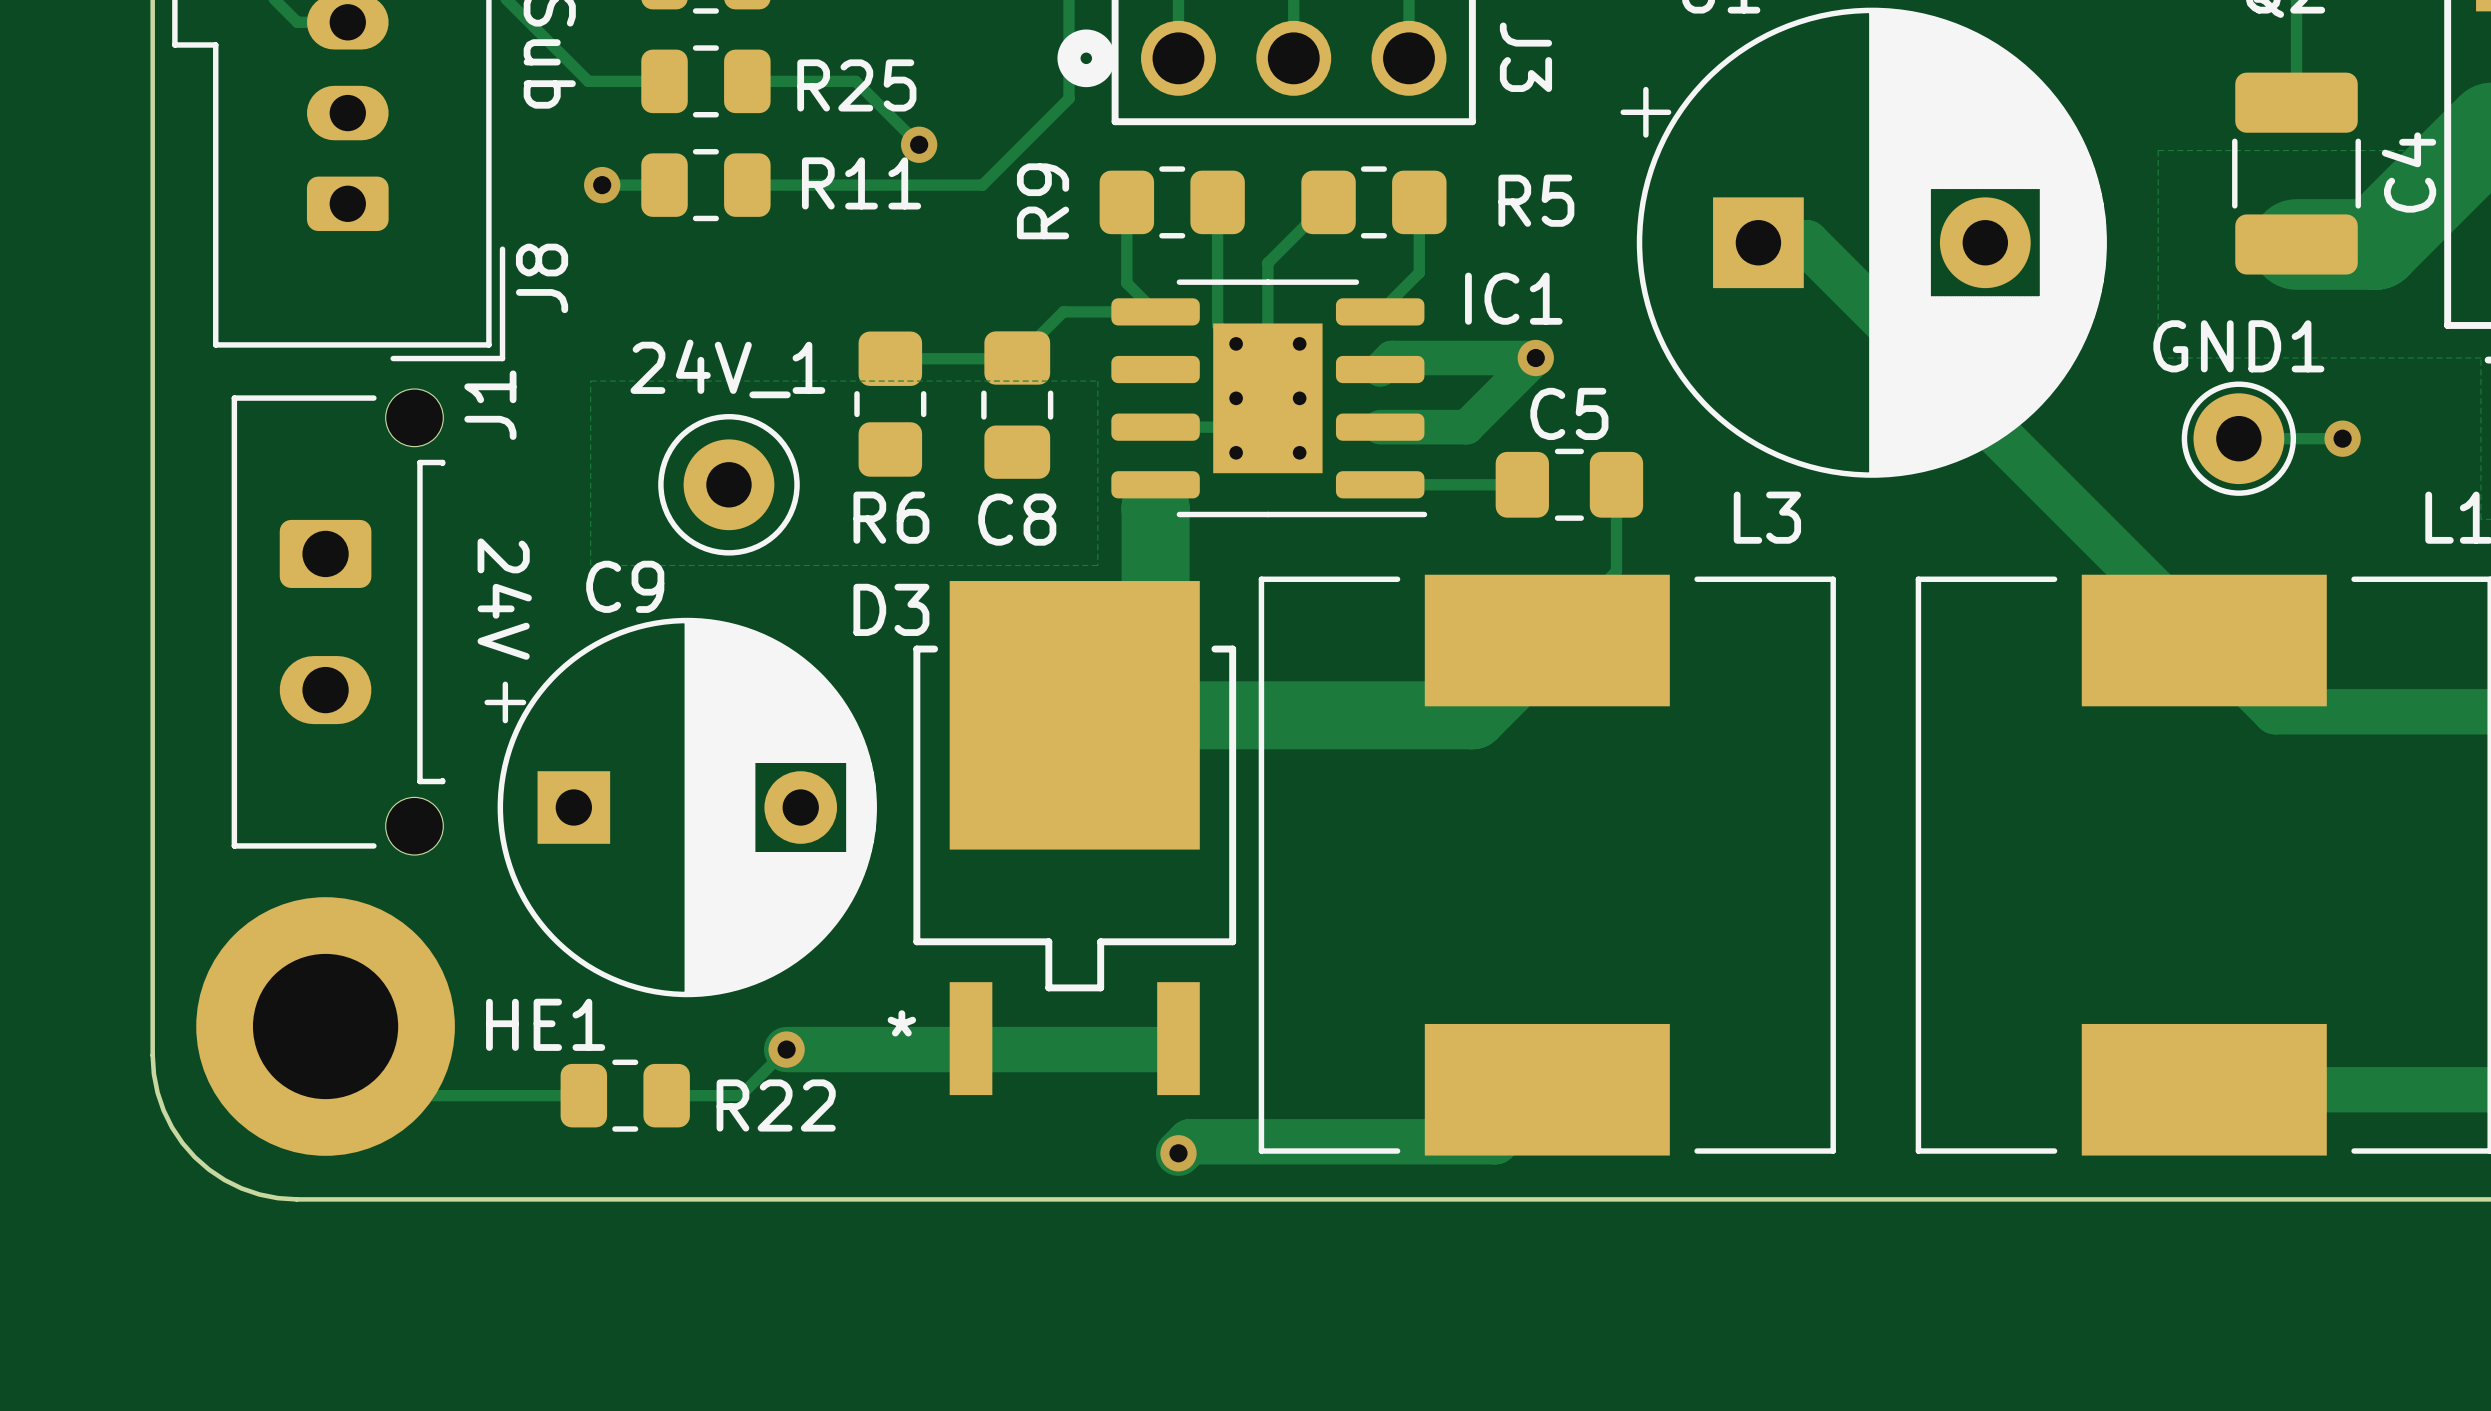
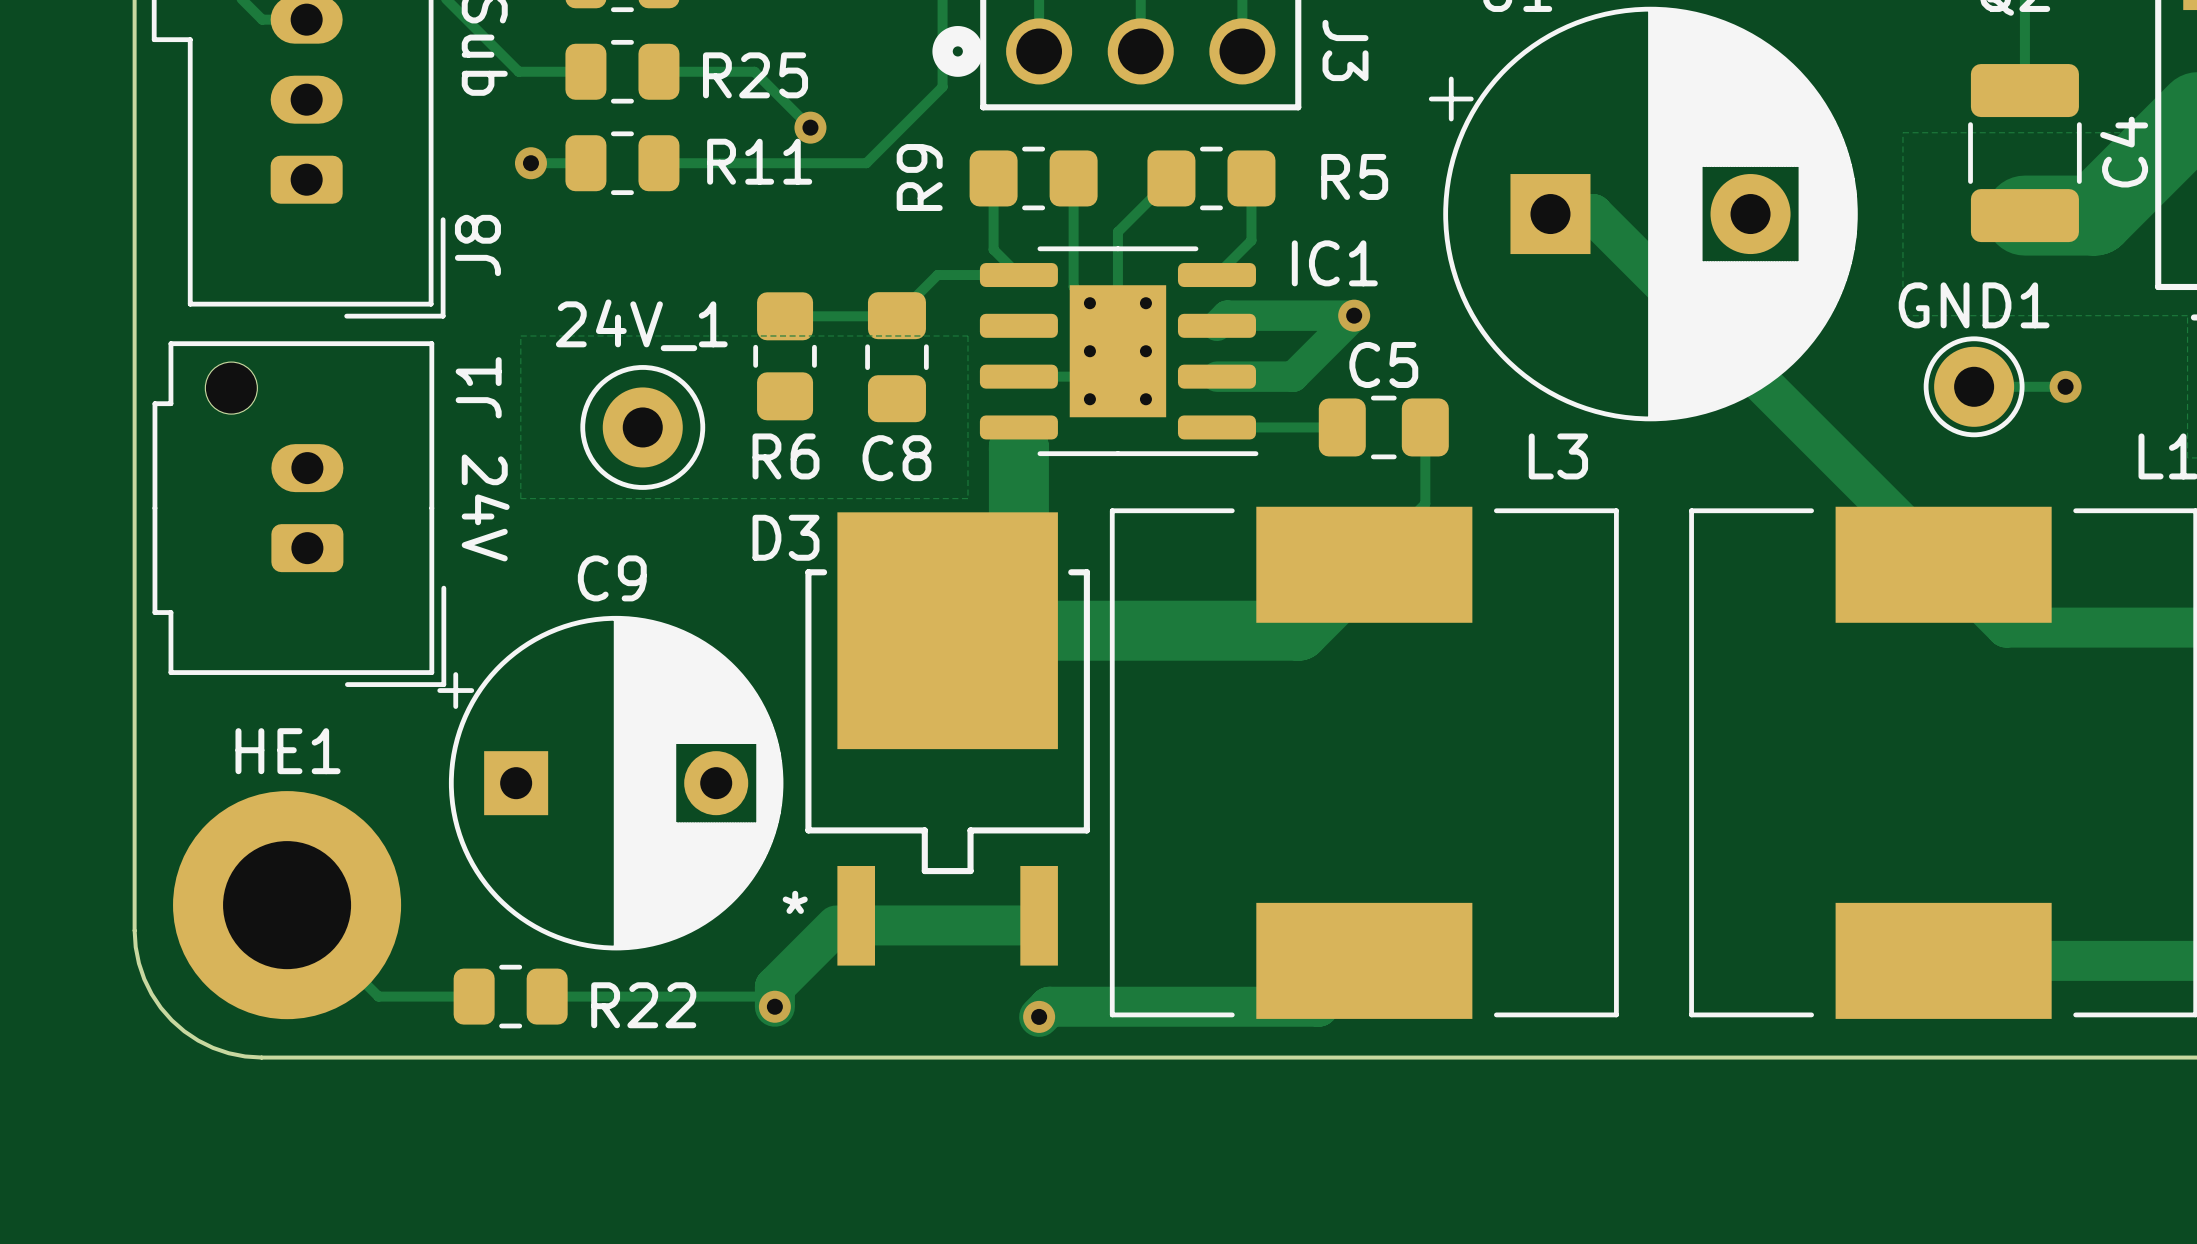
J1 footprint: [231, 388, 446, 856] -> [152, 341, 447, 687]
C9 name position: C9 (625, 586) -> C9 (612, 578)
text position: 24V (504, 599) -> 24V (485, 507)
C9 position: (680, 807) -> (610, 783)
HE1 name position: HE1 (545, 1024) -> HE1 (288, 751)
via position: (786, 1049) -> (774, 1006)
track: (948, 1049) (786, 1049) (740, 1095) (666, 1095) -> (836, 925) (774, 986) (774, 1006) (764, 996) (547, 996)
track: (394, 1095) (583, 1095) -> (348, 966) (378, 996) (474, 996)
R22 position: (625, 1095) -> (510, 996)

